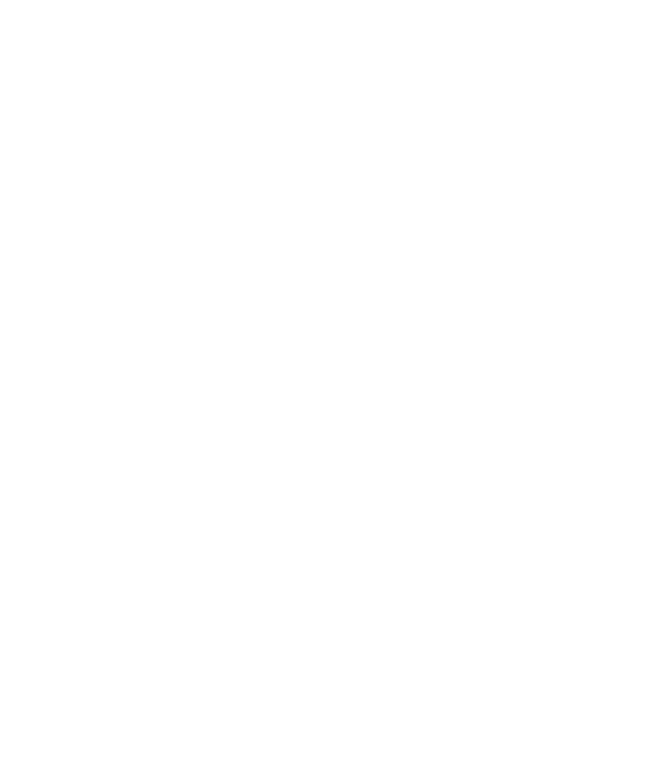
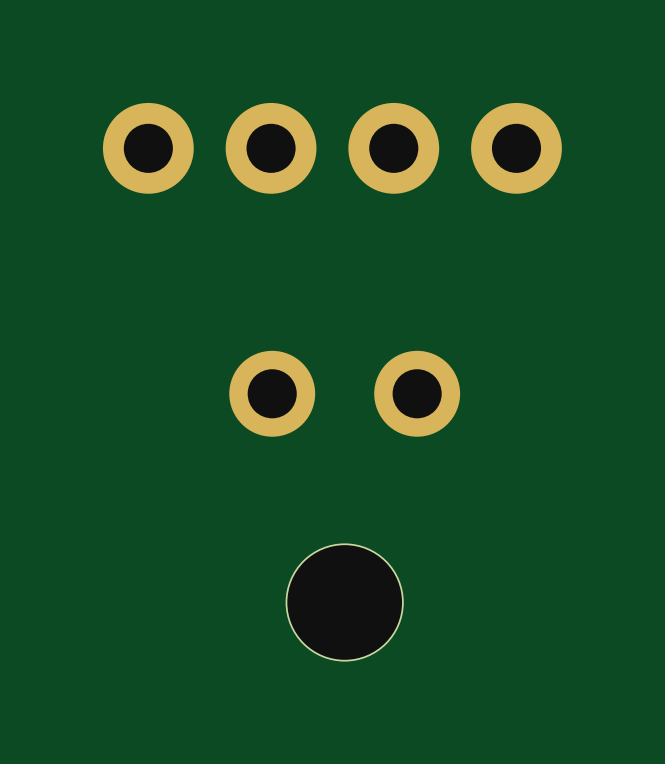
part: none -> (332, 148)
part: none -> (344, 505)

